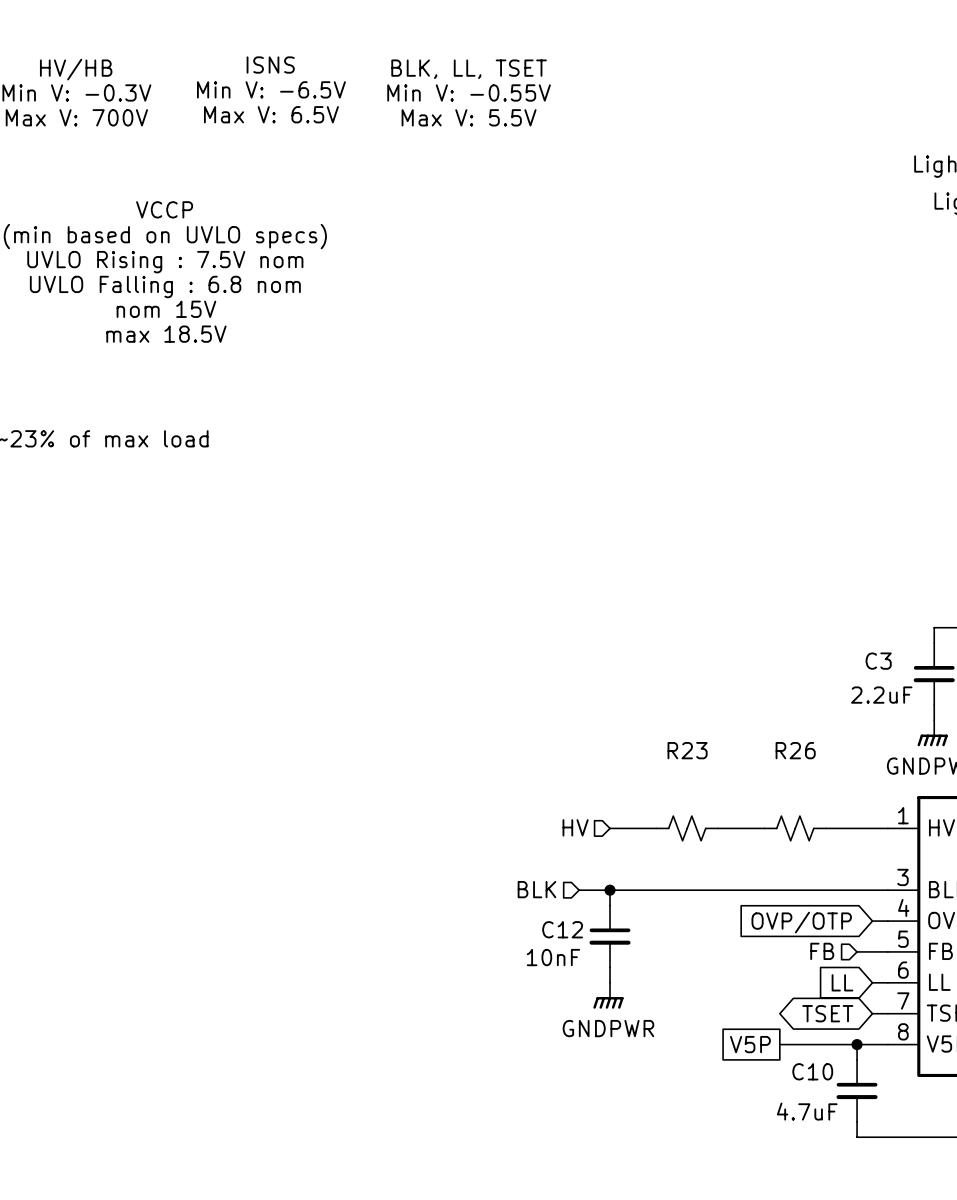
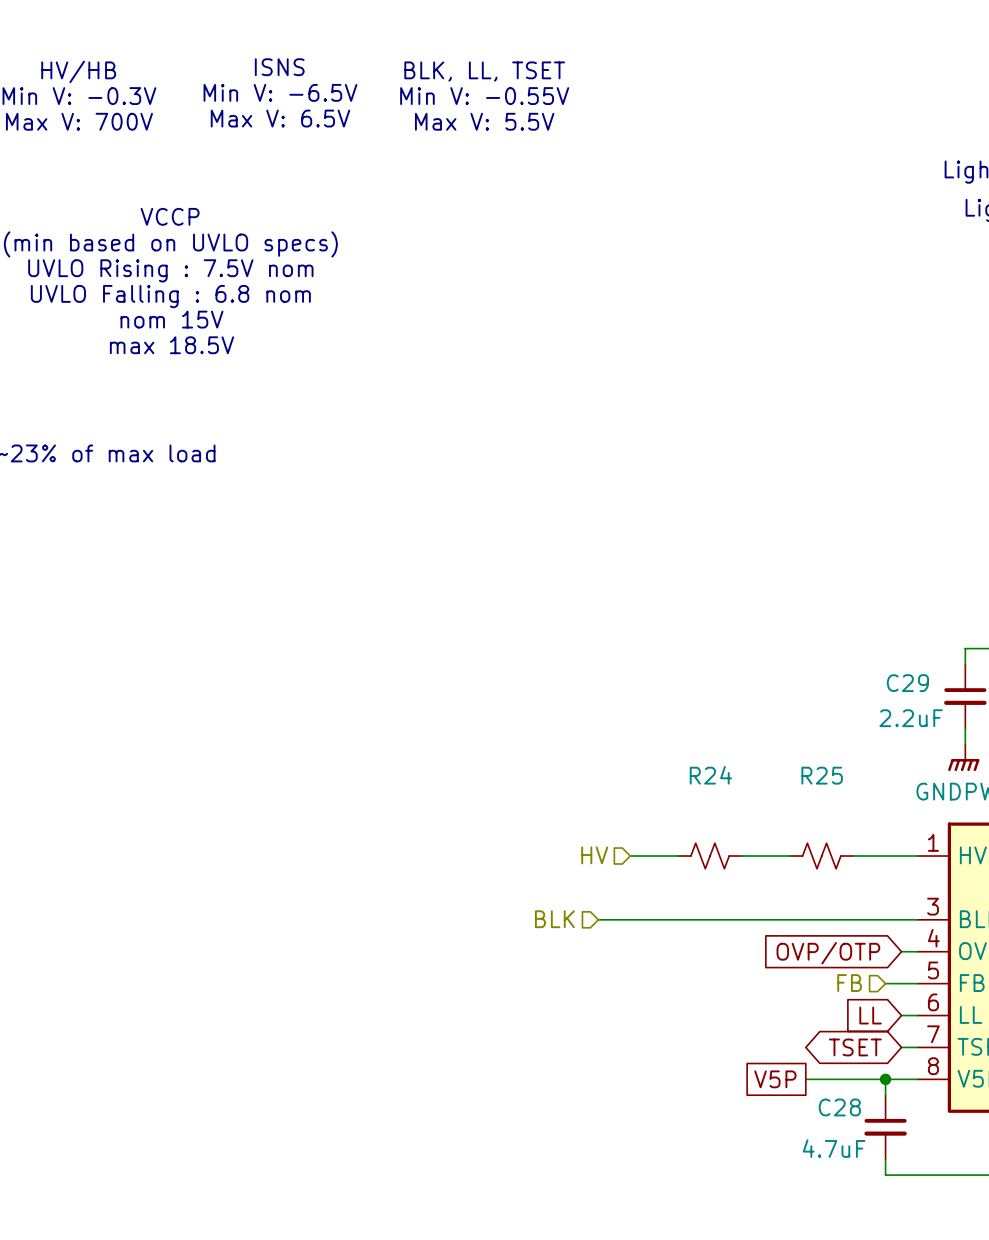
C3 name: C3 (878, 661) -> C29 (907, 683)
R23 name: R23 (687, 750) -> R24 (710, 775)
R26 name: R26 (795, 750) -> R25 (822, 775)
wire: (610, 890) (610, 905) -> none
junction: (610, 890) -> none
C12: 10nF (610, 936) -> none
wire: (610, 967) (610, 982) -> none
power symbol: GNDPWR (608, 995) -> none
C10 name: C10 (812, 1071) -> C28 (839, 1107)

